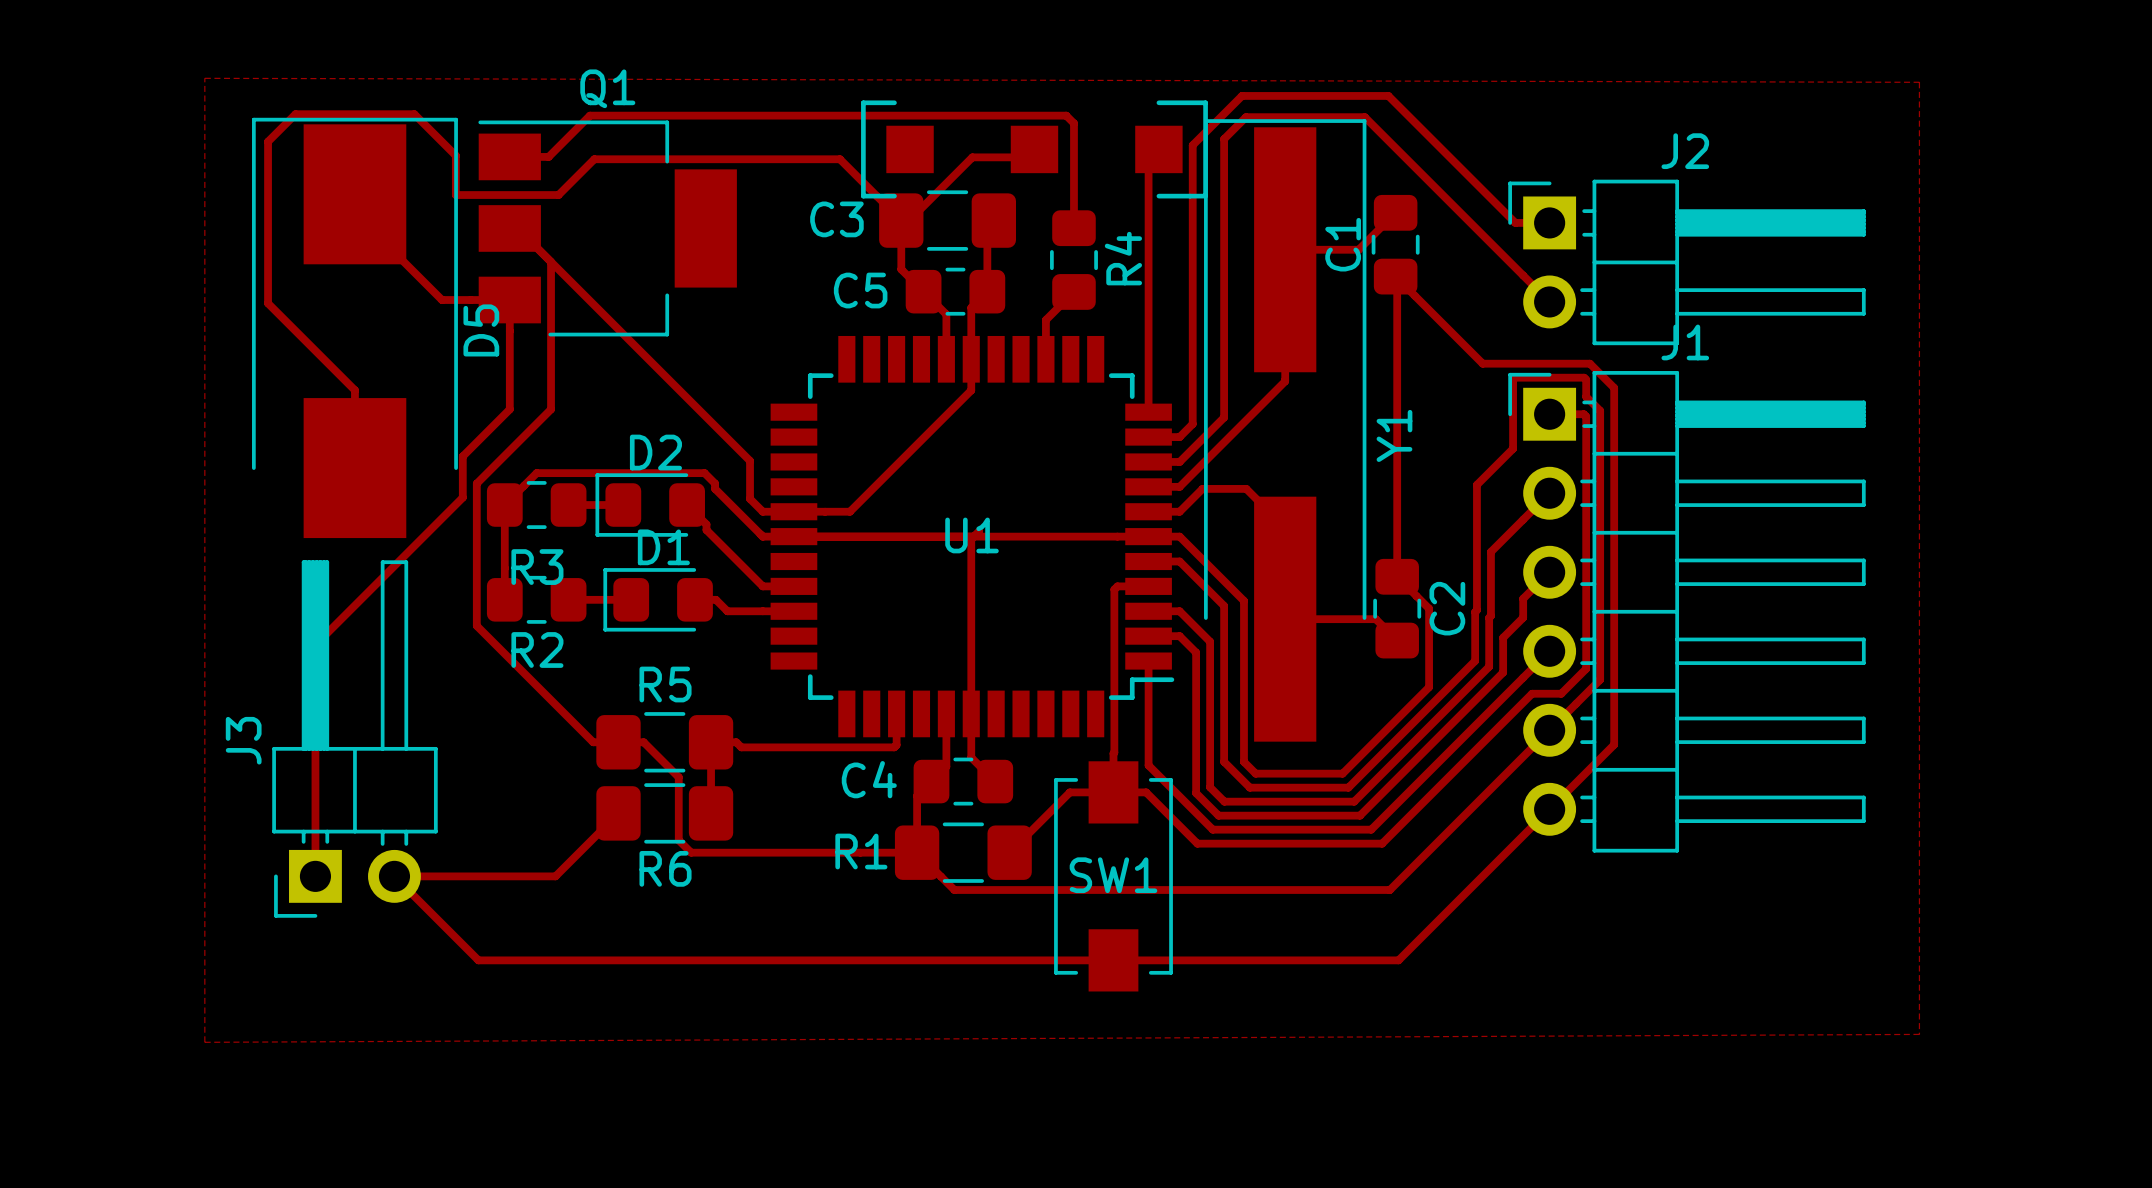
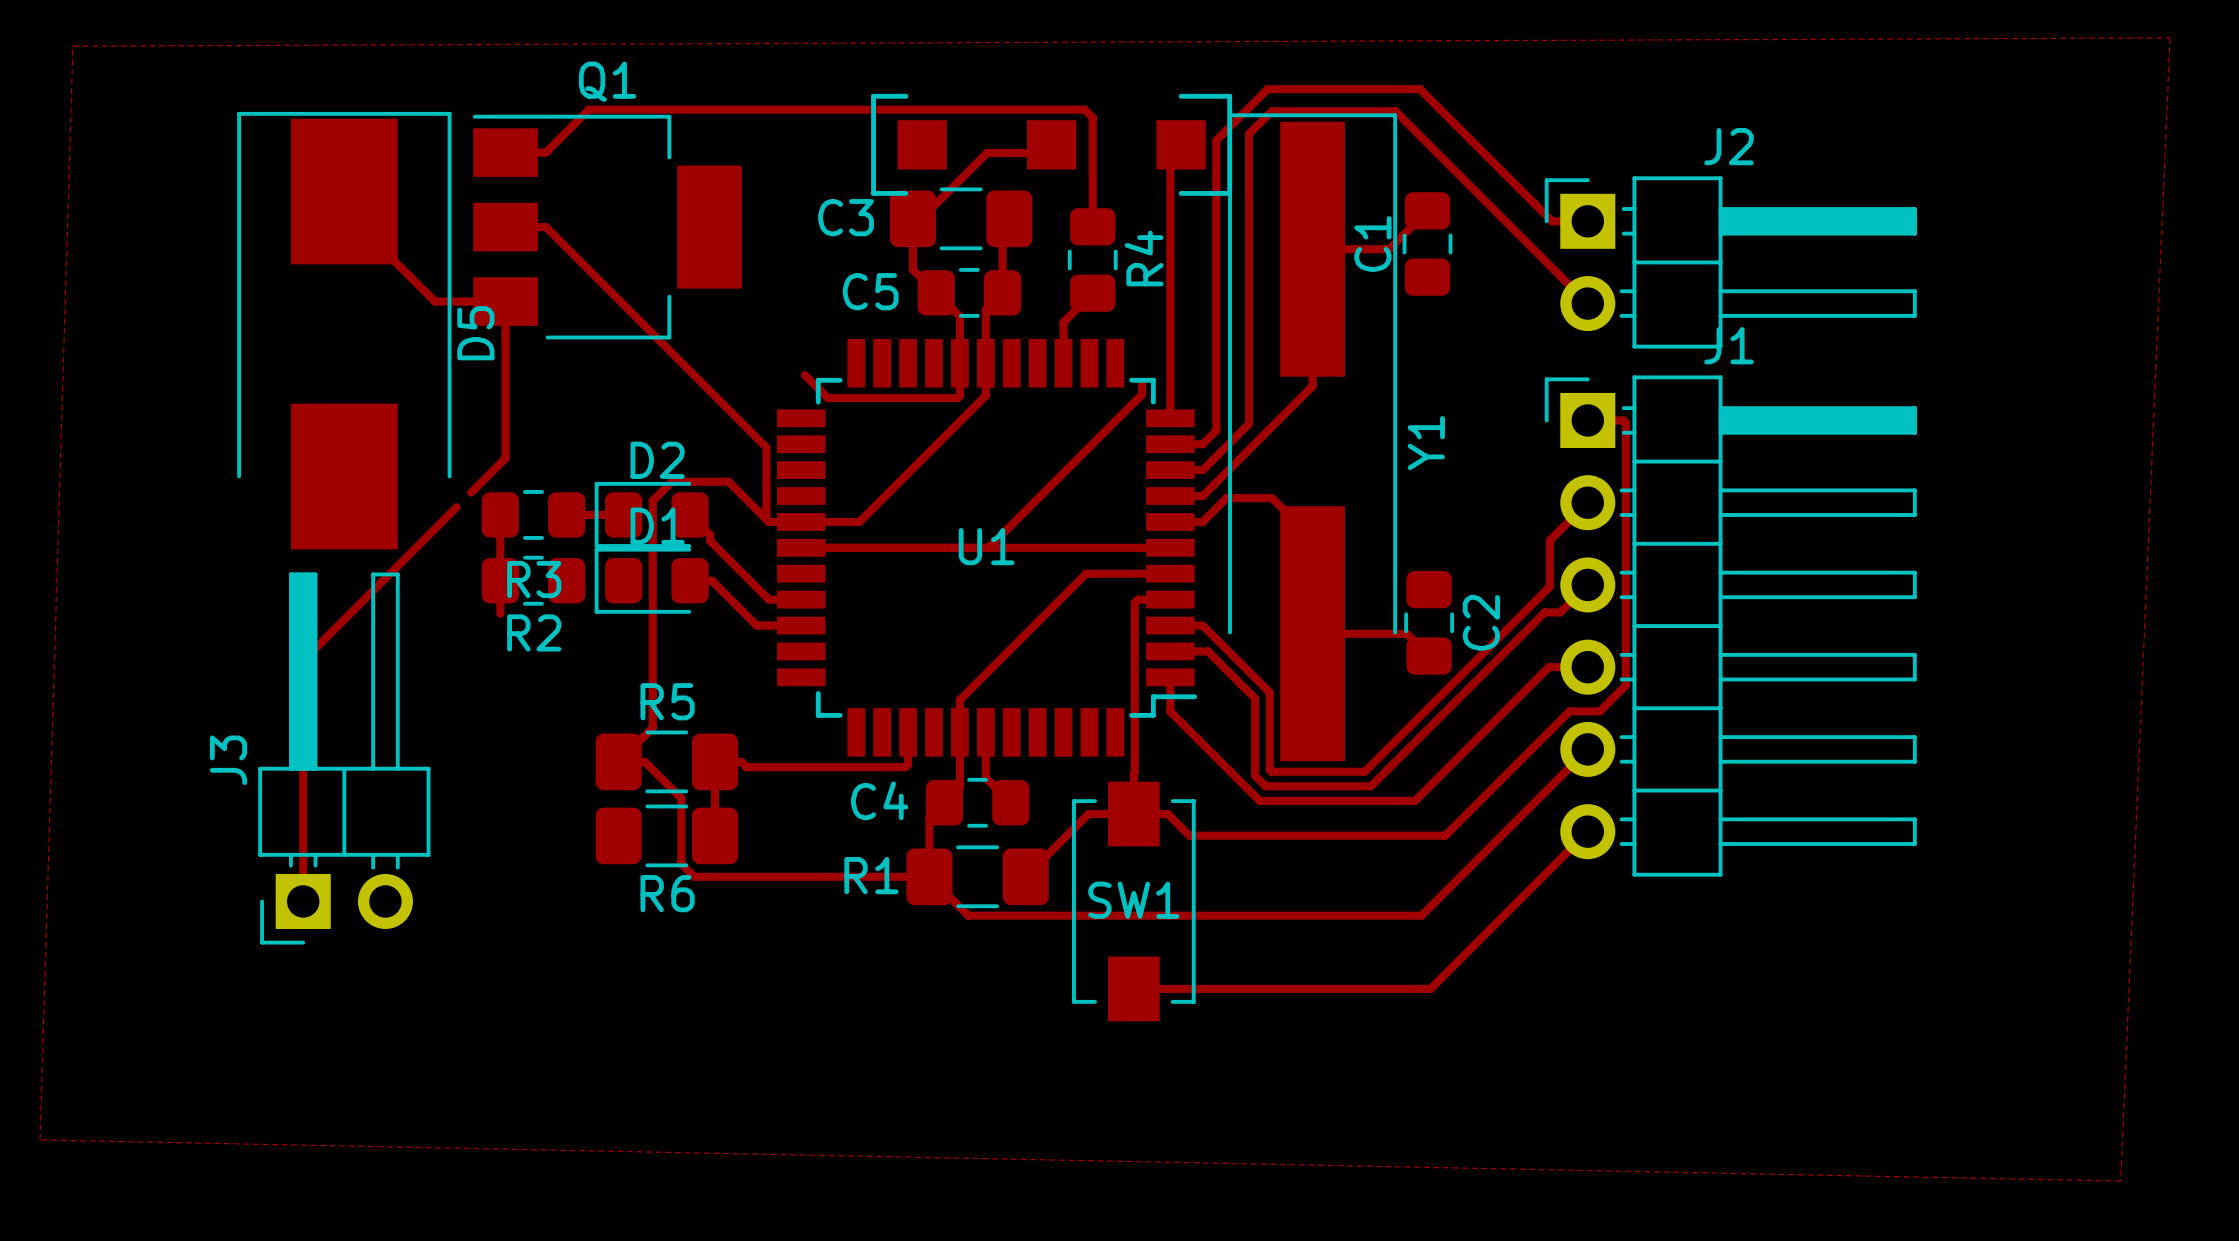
top zone outline: (204, 78) (1919, 82) (1919, 1034) (204, 1042) (204, 78) -> (2170, 37) (72, 46) (40, 1139) (2120, 1181) (2170, 37)
top track: (901, 220) (839, 159) (594, 159) (558, 195) (455, 195) (455, 155) (414, 114) (295, 114) (268, 141) (268, 303) (354, 390) (354, 468) -> none
top track: (517, 228) (750, 460) (750, 498) -> (513, 227) (545, 227) (766, 447) (766, 519)
top track: (551, 261) (551, 409) (509, 450) -> none
top track: (1395, 276) (1482, 363) (1589, 363) (1614, 387) (1614, 744) (1549, 809) -> none
top track: (1397, 278) (1397, 576) (1429, 608) (1429, 687) (1342, 773) (1255, 773) (1243, 761) (1243, 749) -> none
top track: none -> (959, 363) (959, 395) (957, 398) (827, 398) (804, 375)
top track: none -> (1142, 383) (1142, 394) (994, 542)
top track: (509, 409) (462, 456) (462, 497) -> (505, 415) (505, 458)
top track: (669, 473) (536, 473) (504, 505) -> none
top track: (704, 473) (715, 483) (715, 488) (762, 536) (793, 536) -> (708, 481) (728, 481) (755, 508)
top track: (476, 483) (476, 625) (593, 742) (618, 742) -> (671, 481) (652, 500) (652, 727) (618, 761)
top track: (1513, 529) (1490, 551) (1490, 615) -> (1549, 540) (1549, 586) (1512, 624)
top track: (974, 536) (971, 539) (971, 713) -> none
top track: (1148, 536) (1179, 536) (1243, 600) (1243, 675) -> (1234, 657) (1269, 692)
top track: (1148, 561) (1179, 561) (1224, 605) (1224, 761) (1249, 787) (1348, 787) (1475, 660) (1475, 612) -> (1269, 769) (1271, 771) (1364, 771) (1510, 626)
top track: none -> (1170, 573) (1086, 573) (959, 700) (959, 732)
top track: (1523, 598) (1523, 617) (1503, 637) (1503, 672) (1360, 815) (1218, 815) (1196, 793) (1196, 652) (1179, 636) -> (1560, 612) (1544, 612) (1526, 630)
R2 position: (536, 599) -> (533, 580)
top track: (568, 599) (615, 599) -> none
D1 position: (658, 599) -> (651, 580)
top track: (695, 599) (715, 599) (727, 611) (751, 611) -> (690, 580) (711, 580) (756, 625)
top track: (1476, 610) (1476, 484) (1513, 448) (1513, 379) (1515, 377) (1584, 377) (1586, 379) (1586, 396) (1600, 410) (1600, 679) (1549, 730) -> none
top track: (1489, 617) (1489, 666) (1354, 801) (1224, 801) (1210, 787) (1210, 641) -> (1524, 632) (1370, 786) (1265, 786) (1255, 775) (1255, 698) (1208, 651) (1202, 651)
top track: (1549, 651) (1371, 829) (1212, 829) (1148, 765) (1148, 693) -> (1587, 667) (1548, 667) (1415, 800) (1259, 800) (1170, 711)
top track: (618, 813) (555, 876) (394, 876) (478, 960) (1113, 960) -> none
top track: (1166, 813) (1197, 843) (1382, 843) (1412, 813) -> (1189, 835) (1445, 835)

